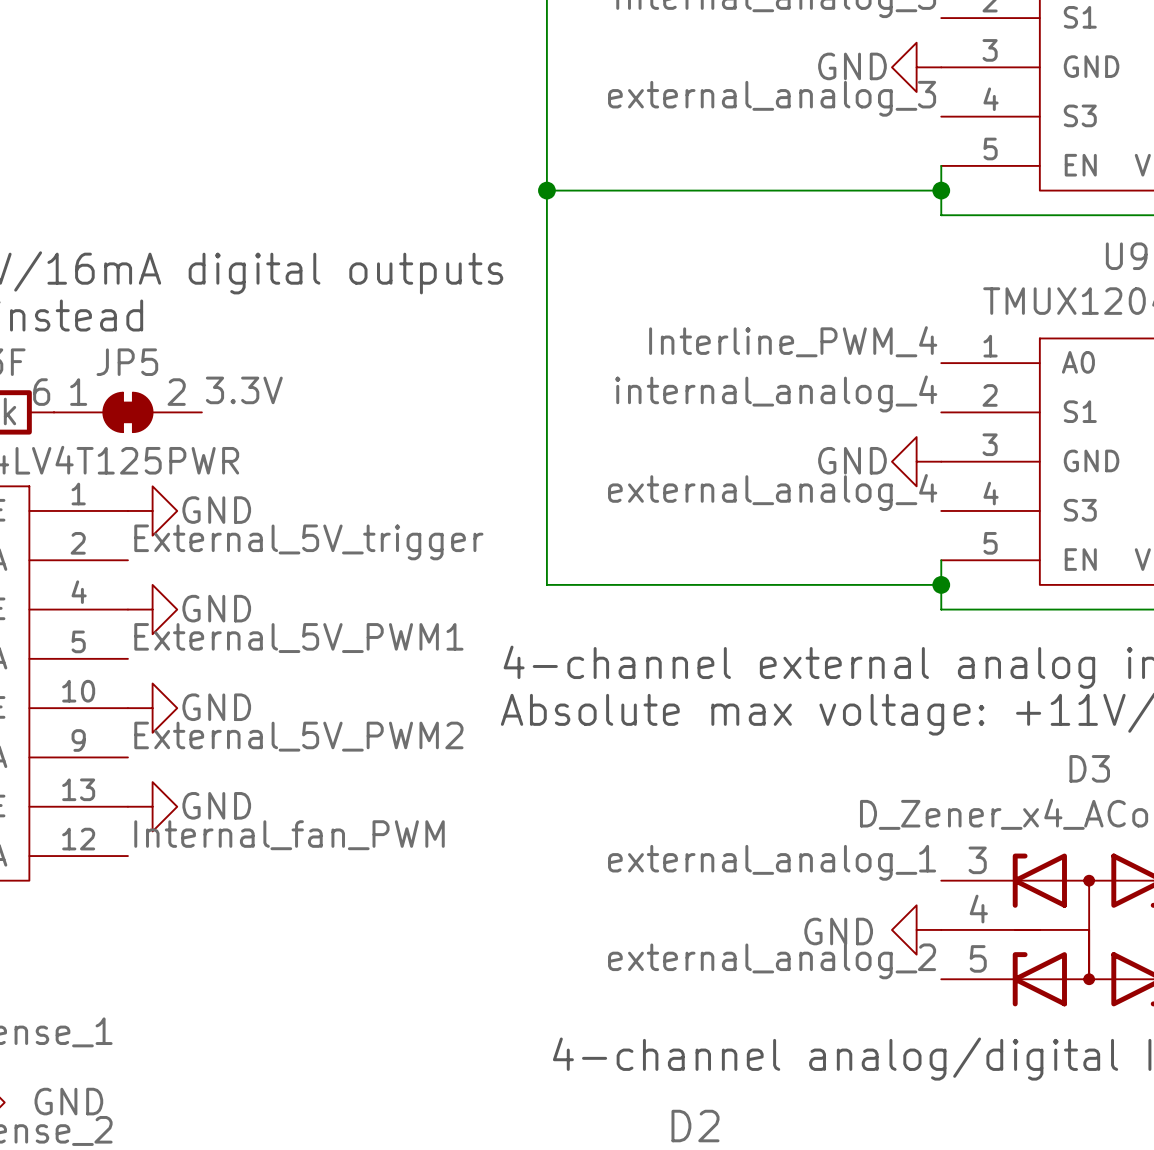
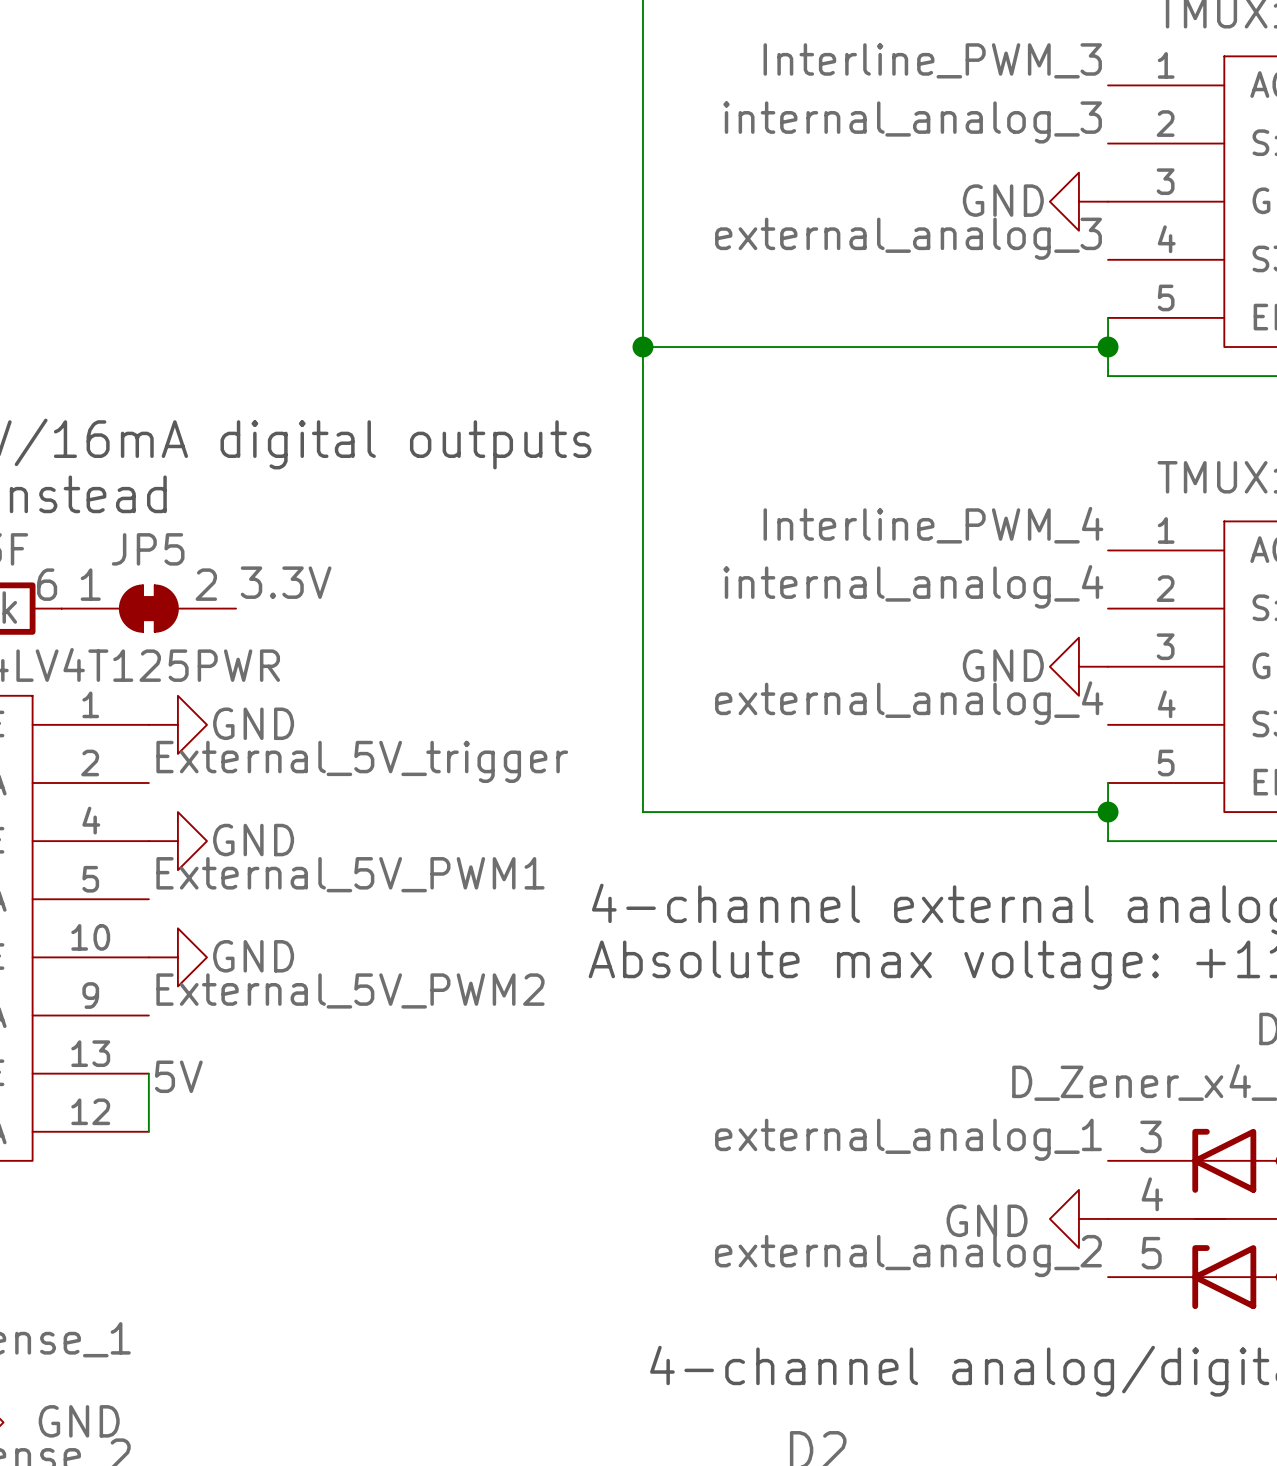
wire: none -> (148, 1073) (148, 1131)
power symbol: GND (152, 806) -> none
label: none -> 5V (178, 1076)
label: Internal_fan_PWM (289, 835) -> none

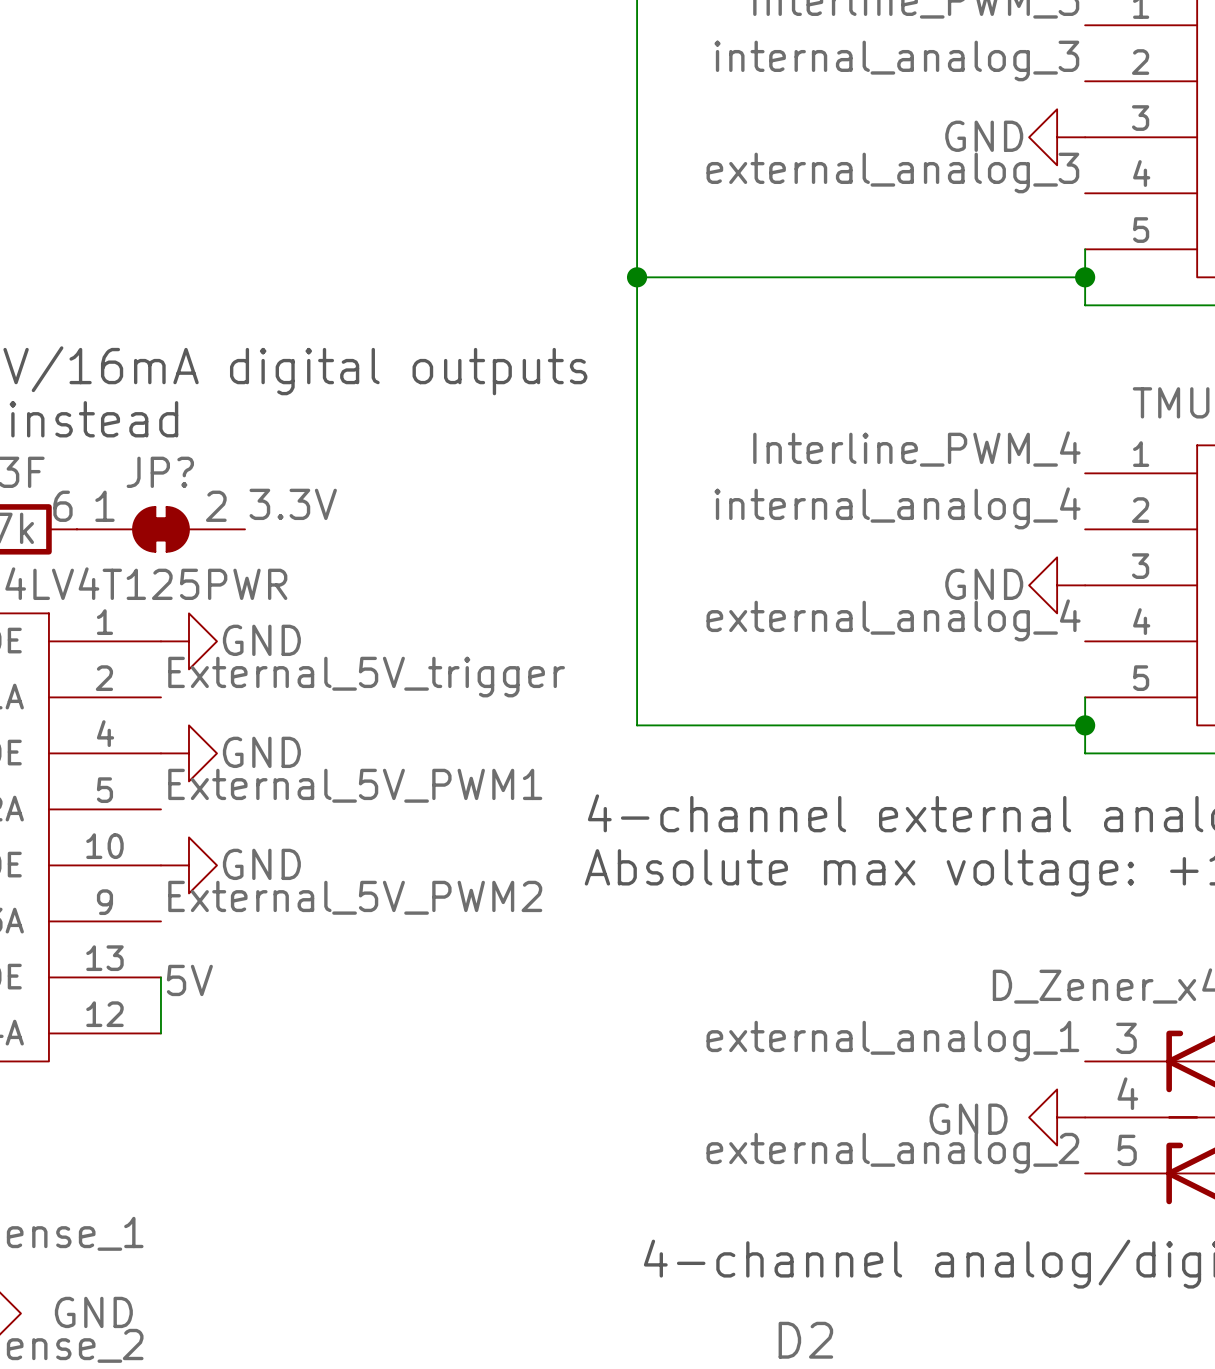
JP5 name: JP5 (148, 549) -> JP? (160, 472)

